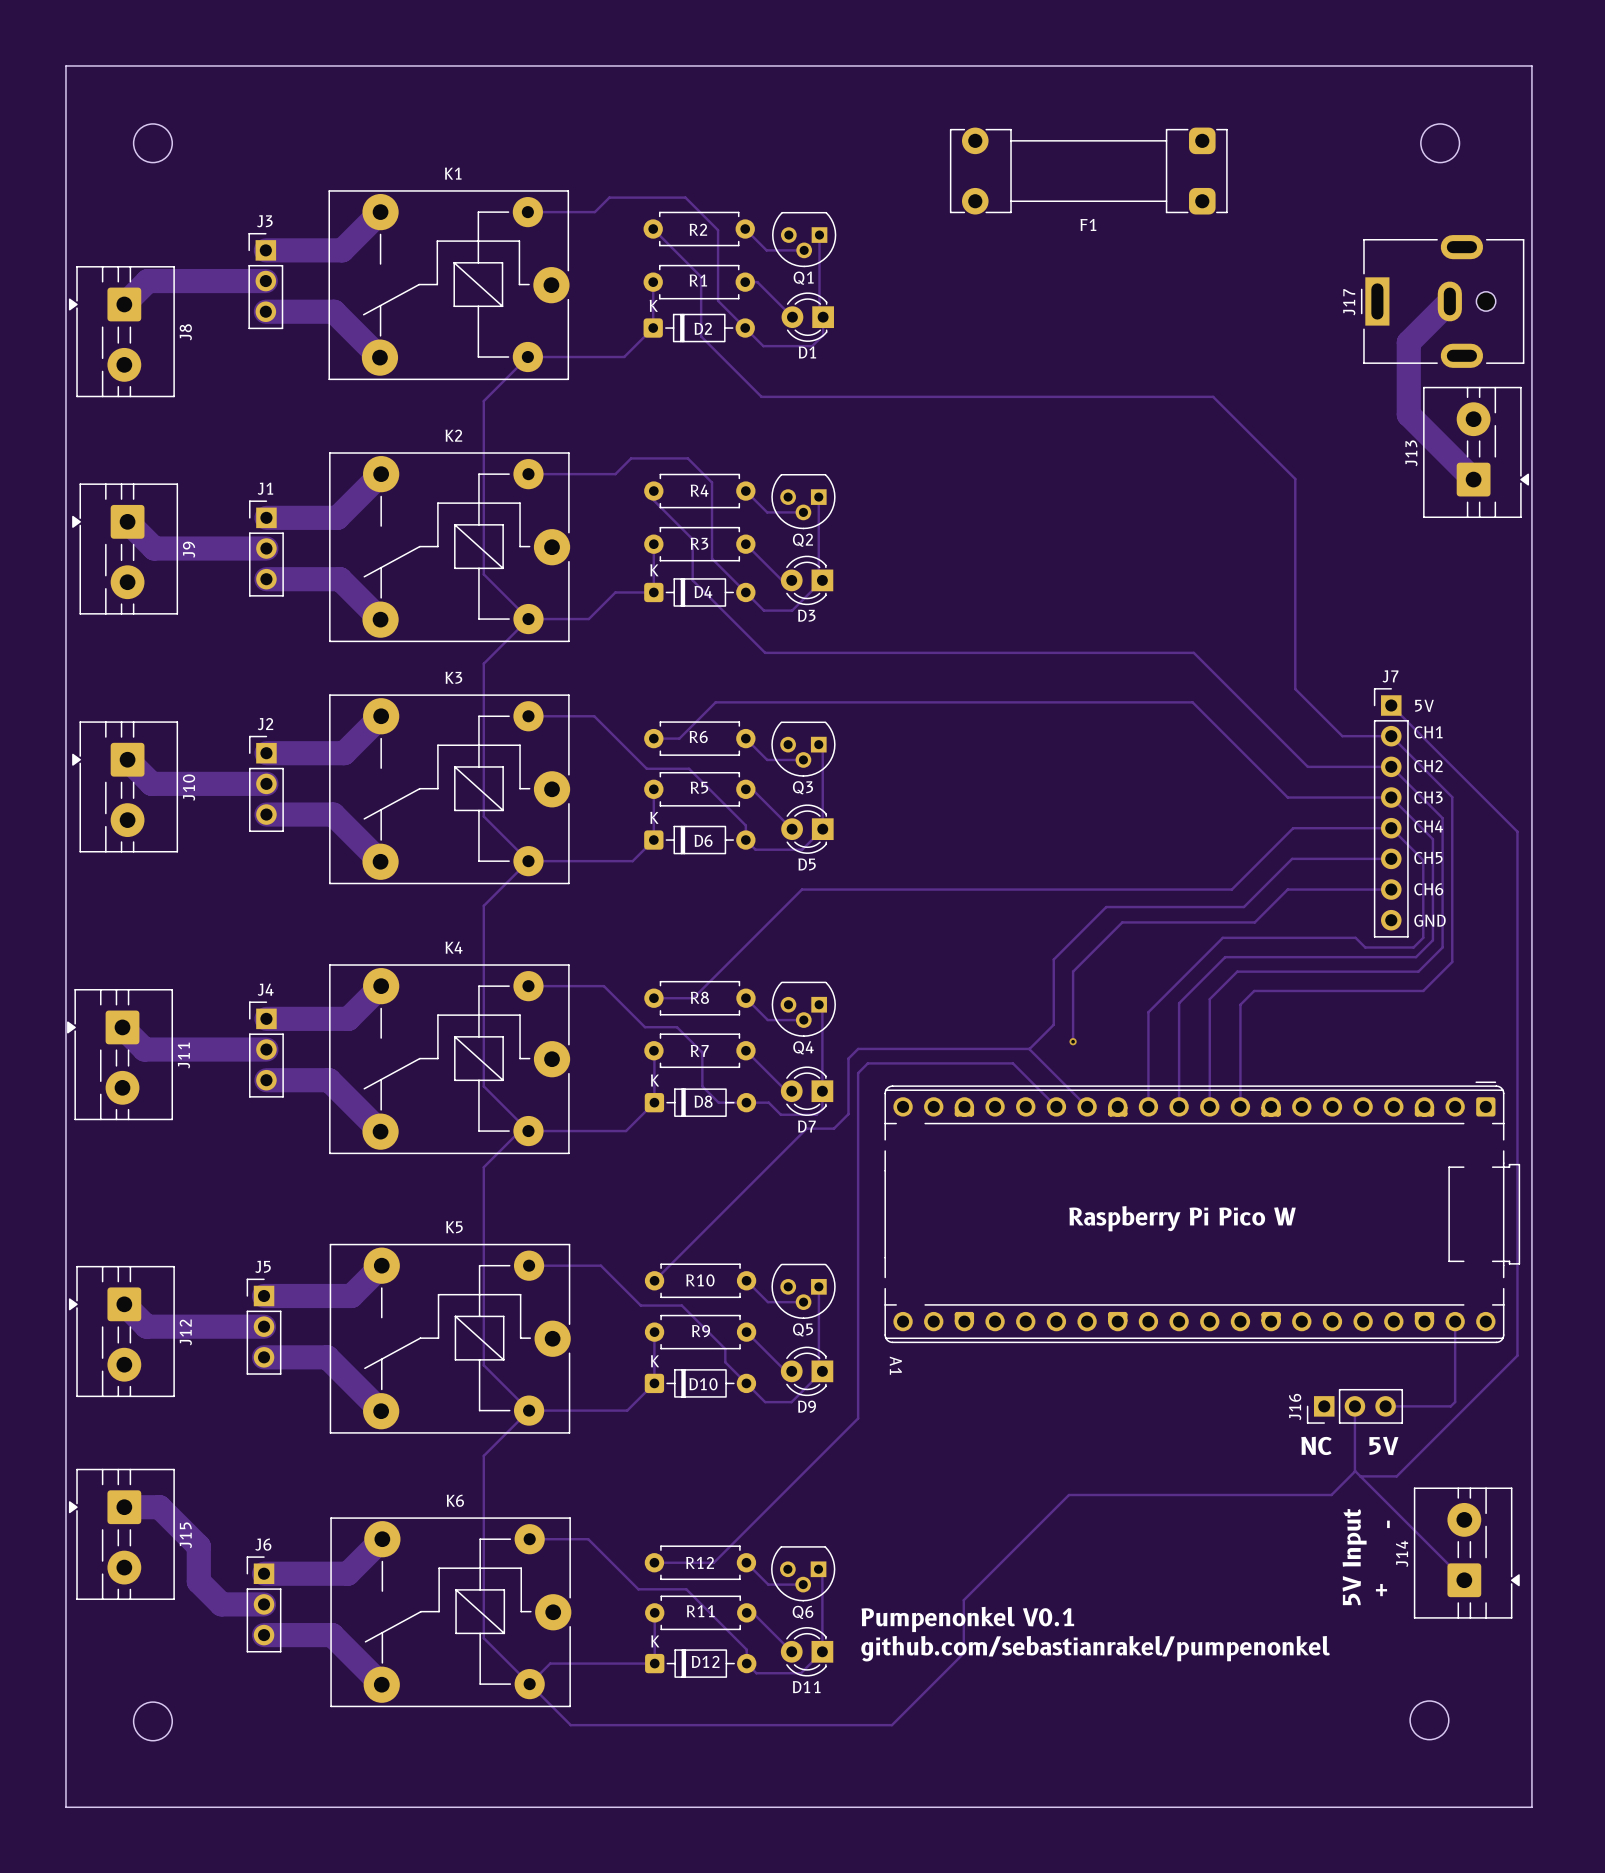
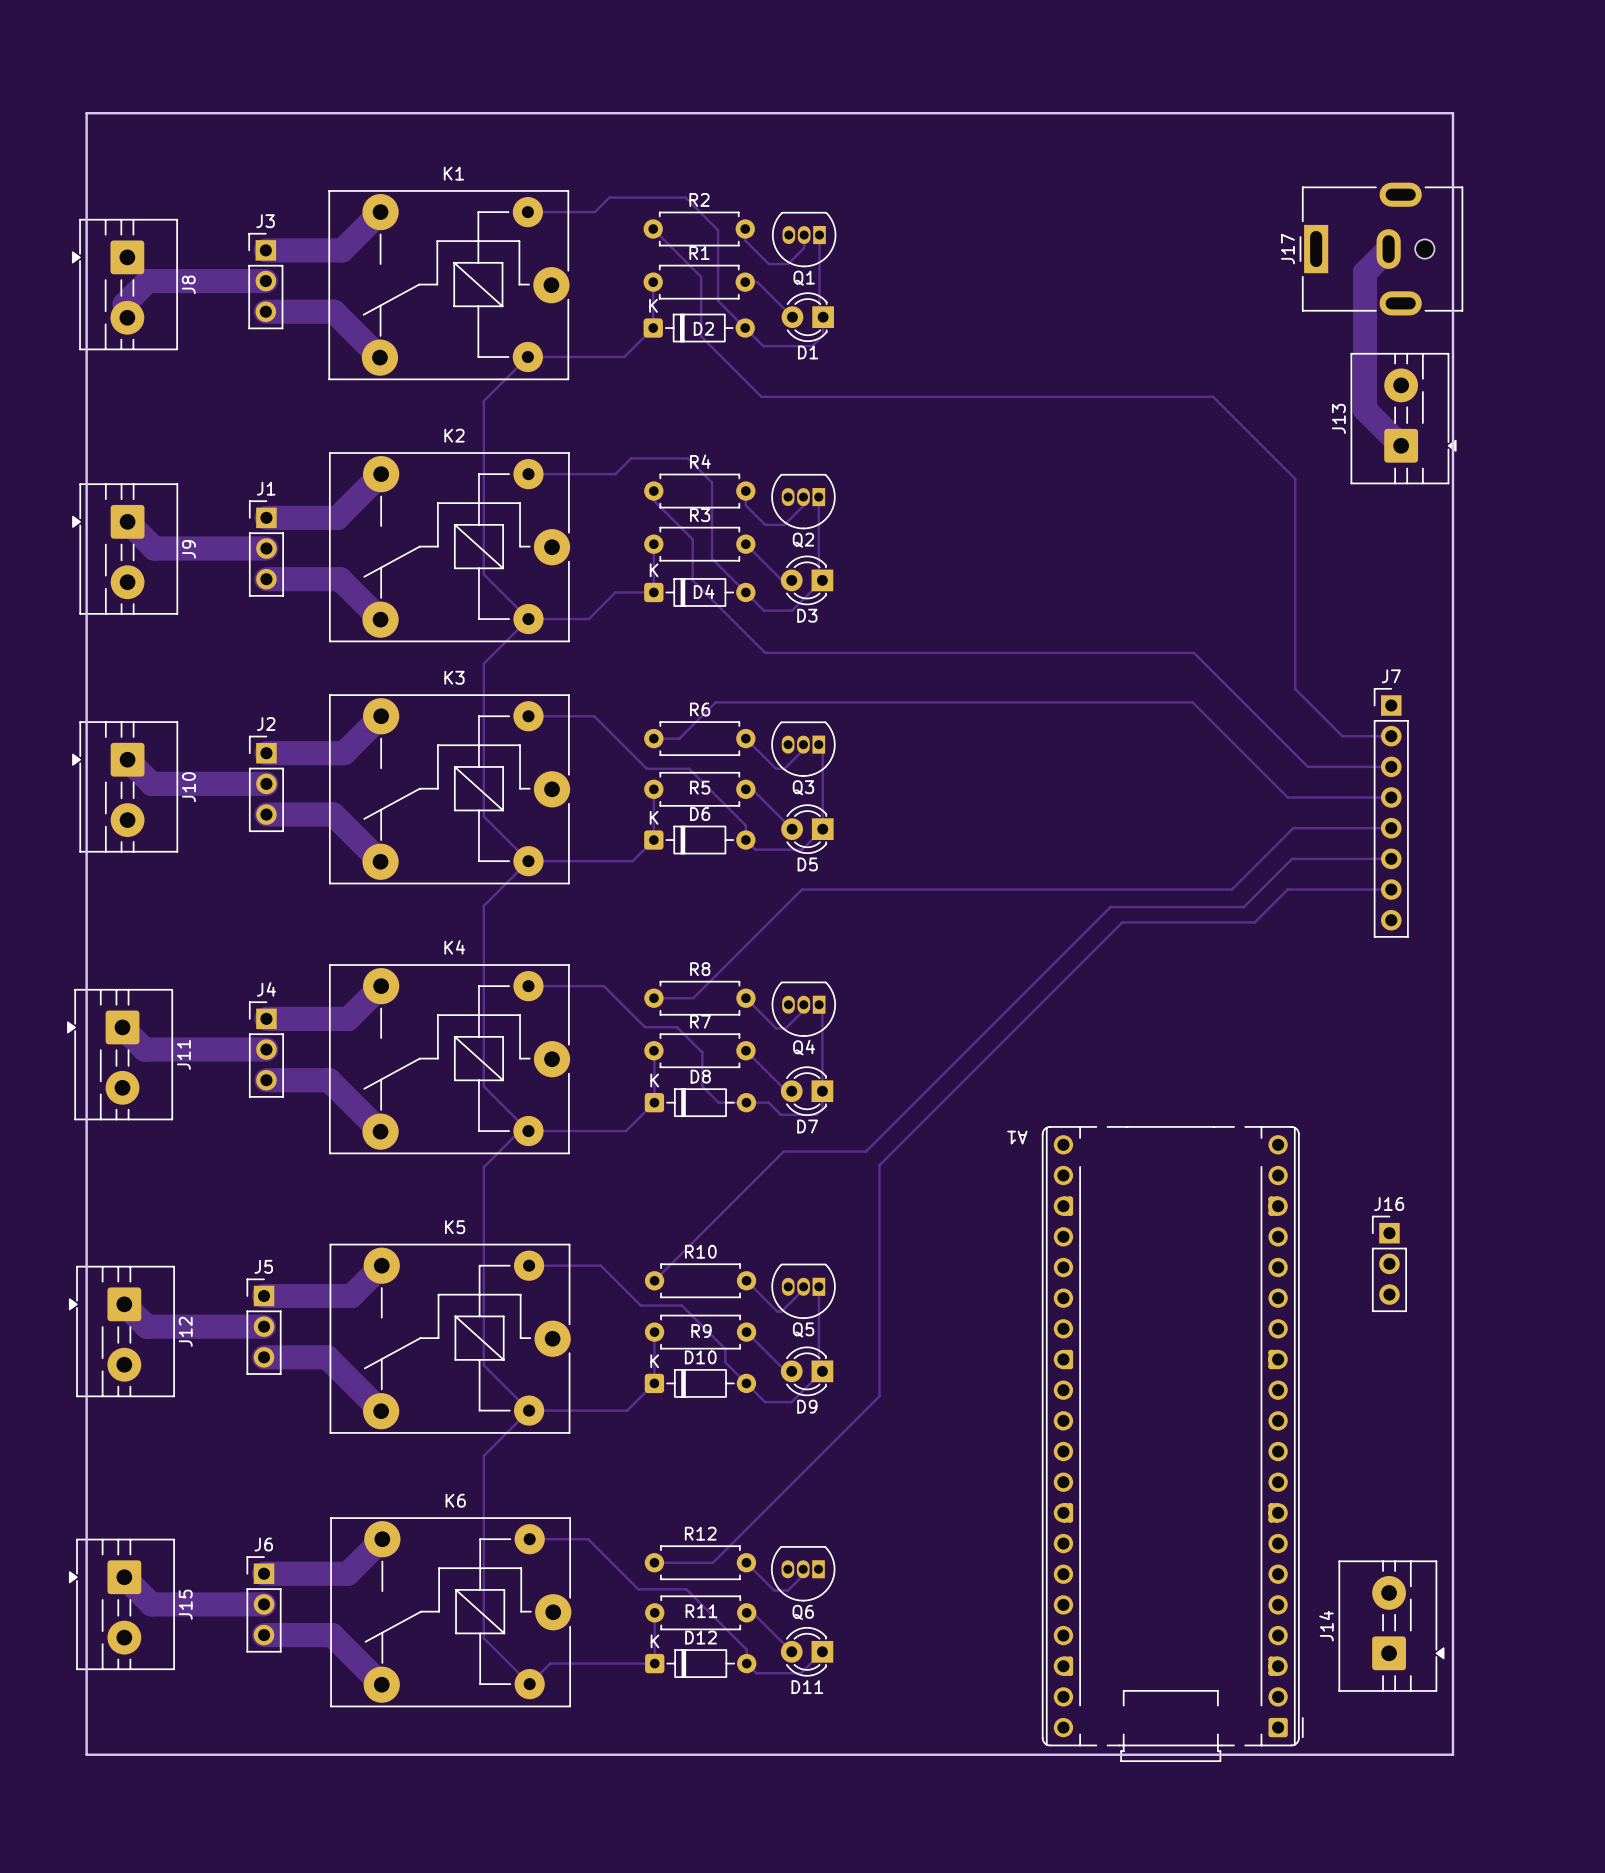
board edge: (65, 65) (1531, 65) (1531, 1807) (65, 1807) (65, 65) -> (86, 113) (86, 1754) (1452, 1754) (1452, 113) (86, 113)
round board edge: [133, 123, 173, 163] -> none
round board edge: [1420, 123, 1460, 163] -> none
F1: (1088, 171) -> none
Q1 footprint: [772, 211, 837, 268] -> [772, 211, 837, 268]
R2 name position: R2 (698, 229) -> R2 (699, 199)
track: (745, 229) (766, 250) (804, 250) -> (745, 229) (745, 240) (768, 264) (788, 264) (804, 247) (804, 235)
track: none -> (1388, 249) (1365, 272) (1365, 409) (1401, 445)
R1 name position: R1 (698, 280) -> R1 (699, 253)
J17 position: (1442, 301) -> (1381, 249)
track: (1449, 301) (1408, 342) (1408, 414) (1473, 479) -> none
J8 position: (121, 331) -> (124, 284)
J13 position: (1476, 452) -> (1403, 418)
Q2 footprint: [771, 474, 836, 530] -> [771, 474, 836, 530]
R4 name position: R4 (699, 490) -> R4 (700, 461)
track: (745, 491) (767, 512) (803, 512) -> (745, 491) (745, 505) (765, 524) (784, 524) (803, 505) (803, 497)
R3 name position: R3 (699, 543) -> R3 (700, 515)
track: (1391, 705) (1517, 831) (1517, 1355) (1396, 1476) (1360, 1476) -> none
text: 5V (1424, 705) -> none
Q3 footprint: [771, 721, 836, 777] -> [771, 721, 836, 777]
text: CH1 (1428, 732) -> none
track: (1391, 736) (1452, 797) (1452, 961) (1423, 990) (1254, 990) (1240, 1004) (1240, 1106) -> none
R6 name position: R6 (698, 737) -> R6 (700, 709)
track: (767, 759) (803, 759) -> (767, 759) (776, 768) (784, 768) (803, 749) (803, 744)
track: (1391, 766) (1442, 818) (1442, 947) (1418, 971) (1237, 971) (1209, 999) (1209, 1106) -> none
text: CH2 (1428, 766) -> none
track: (1391, 797) (1432, 839) (1432, 940) (1416, 957) (1225, 957) (1179, 1003) (1179, 1106) -> none
text: CH3 (1428, 797) -> none
text: CH4 (1428, 826) -> none
track: (1391, 828) (1423, 860) (1423, 937) (1413, 947) (1365, 947) (1355, 937) (1222, 937) (1148, 1012) (1148, 1106) -> none
D6 name position: D6 (703, 840) -> D6 (700, 813)
text: CH5 (1428, 857) -> none
text: CH6 (1428, 889) -> none
track: (1110, 907) (1106, 907) (1053, 959) (1053, 1024) (1029, 1048) (858, 1048) (848, 1058) (848, 1114) (833, 1128) (806, 1128) (783, 1151) -> (1110, 907) (865, 1151) (783, 1151)
text: GND (1430, 920) -> none
track: (1073, 971) (1073, 1041) -> none
Q4 footprint: [771, 981, 836, 1037] -> [771, 981, 836, 1037]
R8 name position: R8 (699, 997) -> R8 (700, 969)
track: (767, 1020) (803, 1020) -> (767, 1020) (776, 1028) (785, 1028) (803, 1010) (803, 1004)
via: (1073, 1041) -> none
track: (1029, 1048) (1087, 1106) -> none
R7 name position: R7 (699, 1050) -> R7 (700, 1021)
D8 name position: D8 (703, 1101) -> D8 (700, 1076)
track: (1056, 1106) (1012, 1063) (867, 1063) (858, 1073) (858, 1418) (712, 1562) -> (1073, 971) (879, 1165) (879, 1396) (712, 1562)
A1 rotation: 0° (1202, 1212) -> 90° clockwise (1172, 1444)
text: Raspberry Pi Pico W (1182, 1218) -> none
Q5 footprint: [771, 1263, 836, 1319] -> [771, 1263, 836, 1319]
R10 name position: R10 (700, 1280) -> R10 (700, 1251)
track: (767, 1302) (803, 1302) -> (767, 1302) (777, 1311) (781, 1311) (803, 1289) (803, 1286)
track: (1455, 1321) (1455, 1402) (1450, 1406) (1385, 1406) -> none
D10 name position: D10 (703, 1384) -> D10 (700, 1357)
track: (1354, 1406) (1354, 1471) -> none
J16 rotation: 0° (1354, 1406) -> 90° clockwise (1389, 1263)
J16 position: (1354, 1406) -> (1389, 1263)
text: NC (1316, 1445) -> none
text: 5V (1383, 1445) -> none
track: (1354, 1471) (1464, 1580) -> none
track: (1354, 1471) (1331, 1495) (1068, 1495) (963, 1600) (963, 1653) (891, 1725) (570, 1725) (529, 1684) -> none
track: (124, 1507) (159, 1507) (198, 1546) (198, 1581) (221, 1604) -> (124, 1577) (151, 1604) (221, 1604)
text: - (1388, 1524) -> none
J15 position: (121, 1534) -> (121, 1604)
Q6 footprint: [771, 1546, 836, 1602] -> [771, 1546, 836, 1602]
J14 position: (1466, 1553) -> (1391, 1626)
text: 5V Input (1354, 1557) -> none
R12 name position: R12 (700, 1562) -> R12 (700, 1533)
track: (818, 1569) (822, 1573) (822, 1651) -> none
track: (768, 1584) (803, 1584) -> (768, 1584) (774, 1590) (787, 1590) (803, 1575) (803, 1569)
text: + (1381, 1590) -> none
text: Pumpenonkel V0.1 (967, 1619) -> none
text: github.com/sebastianrakel/pumpenonkel (1095, 1648) -> none
D12 name position: D12 (705, 1661) -> D12 (701, 1637)
round board edge: [1409, 1700, 1450, 1740] -> none
round board edge: [133, 1701, 173, 1742] -> none

